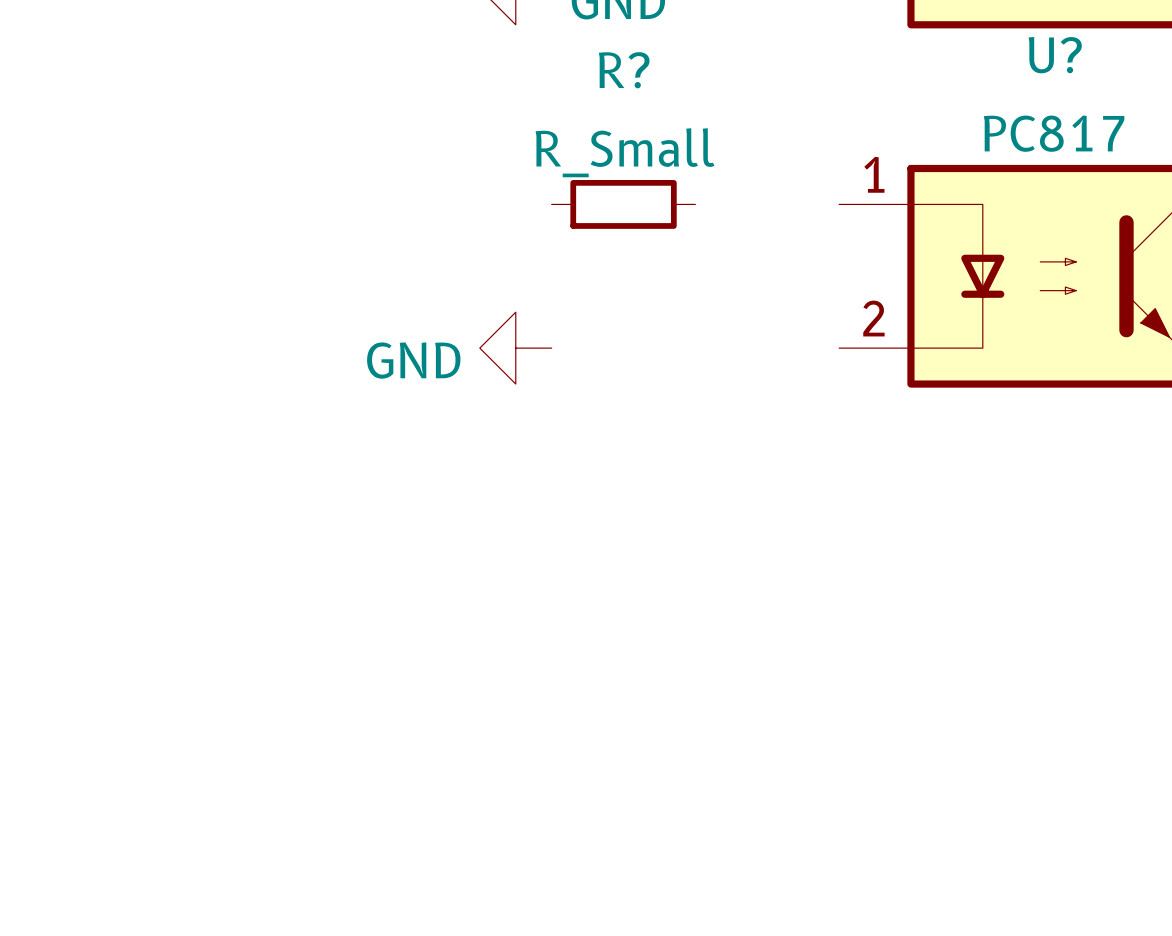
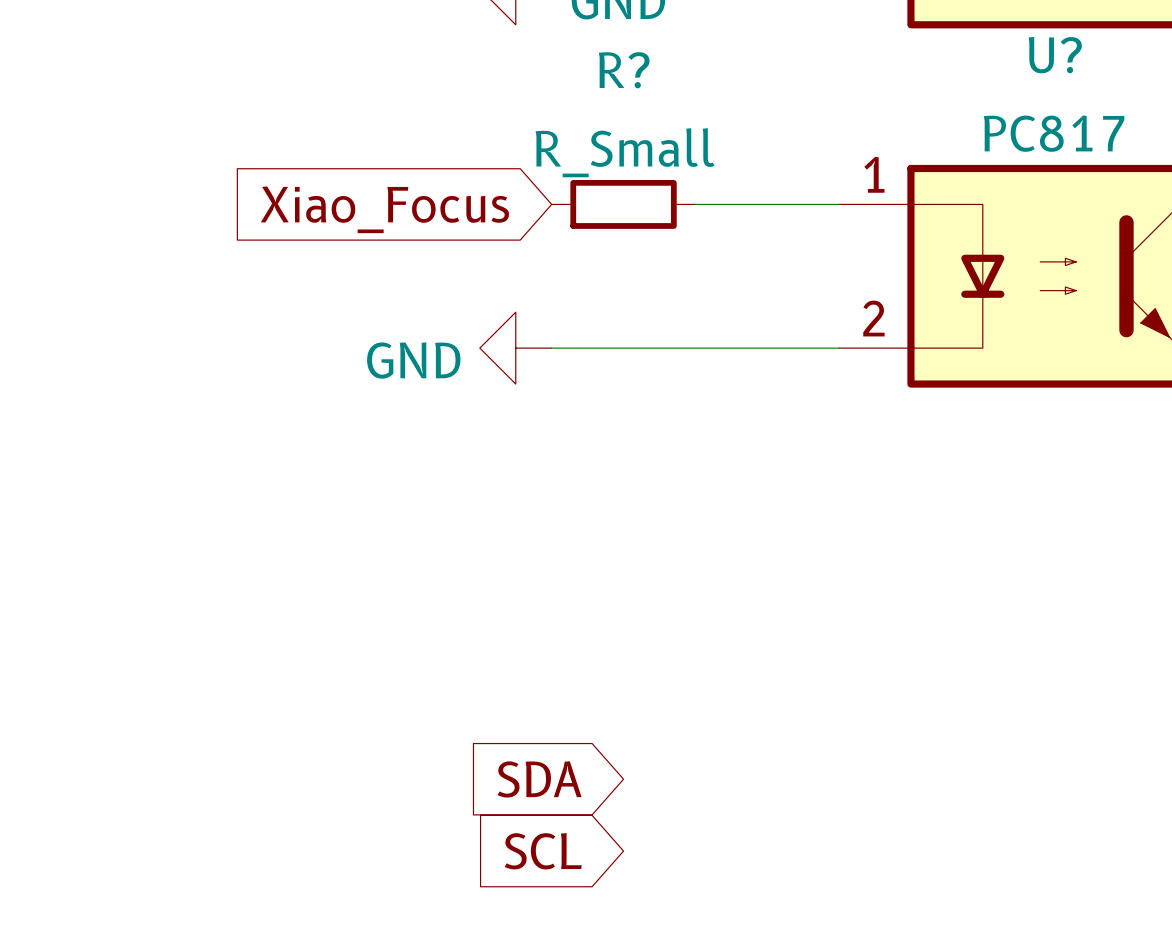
wire: none -> (695, 204) (839, 204)
global label: none -> Xiao_Focus (384, 209)
wire: none -> (551, 348) (839, 348)
global label: none -> SDA (539, 779)
global label: none -> SCL (543, 851)

